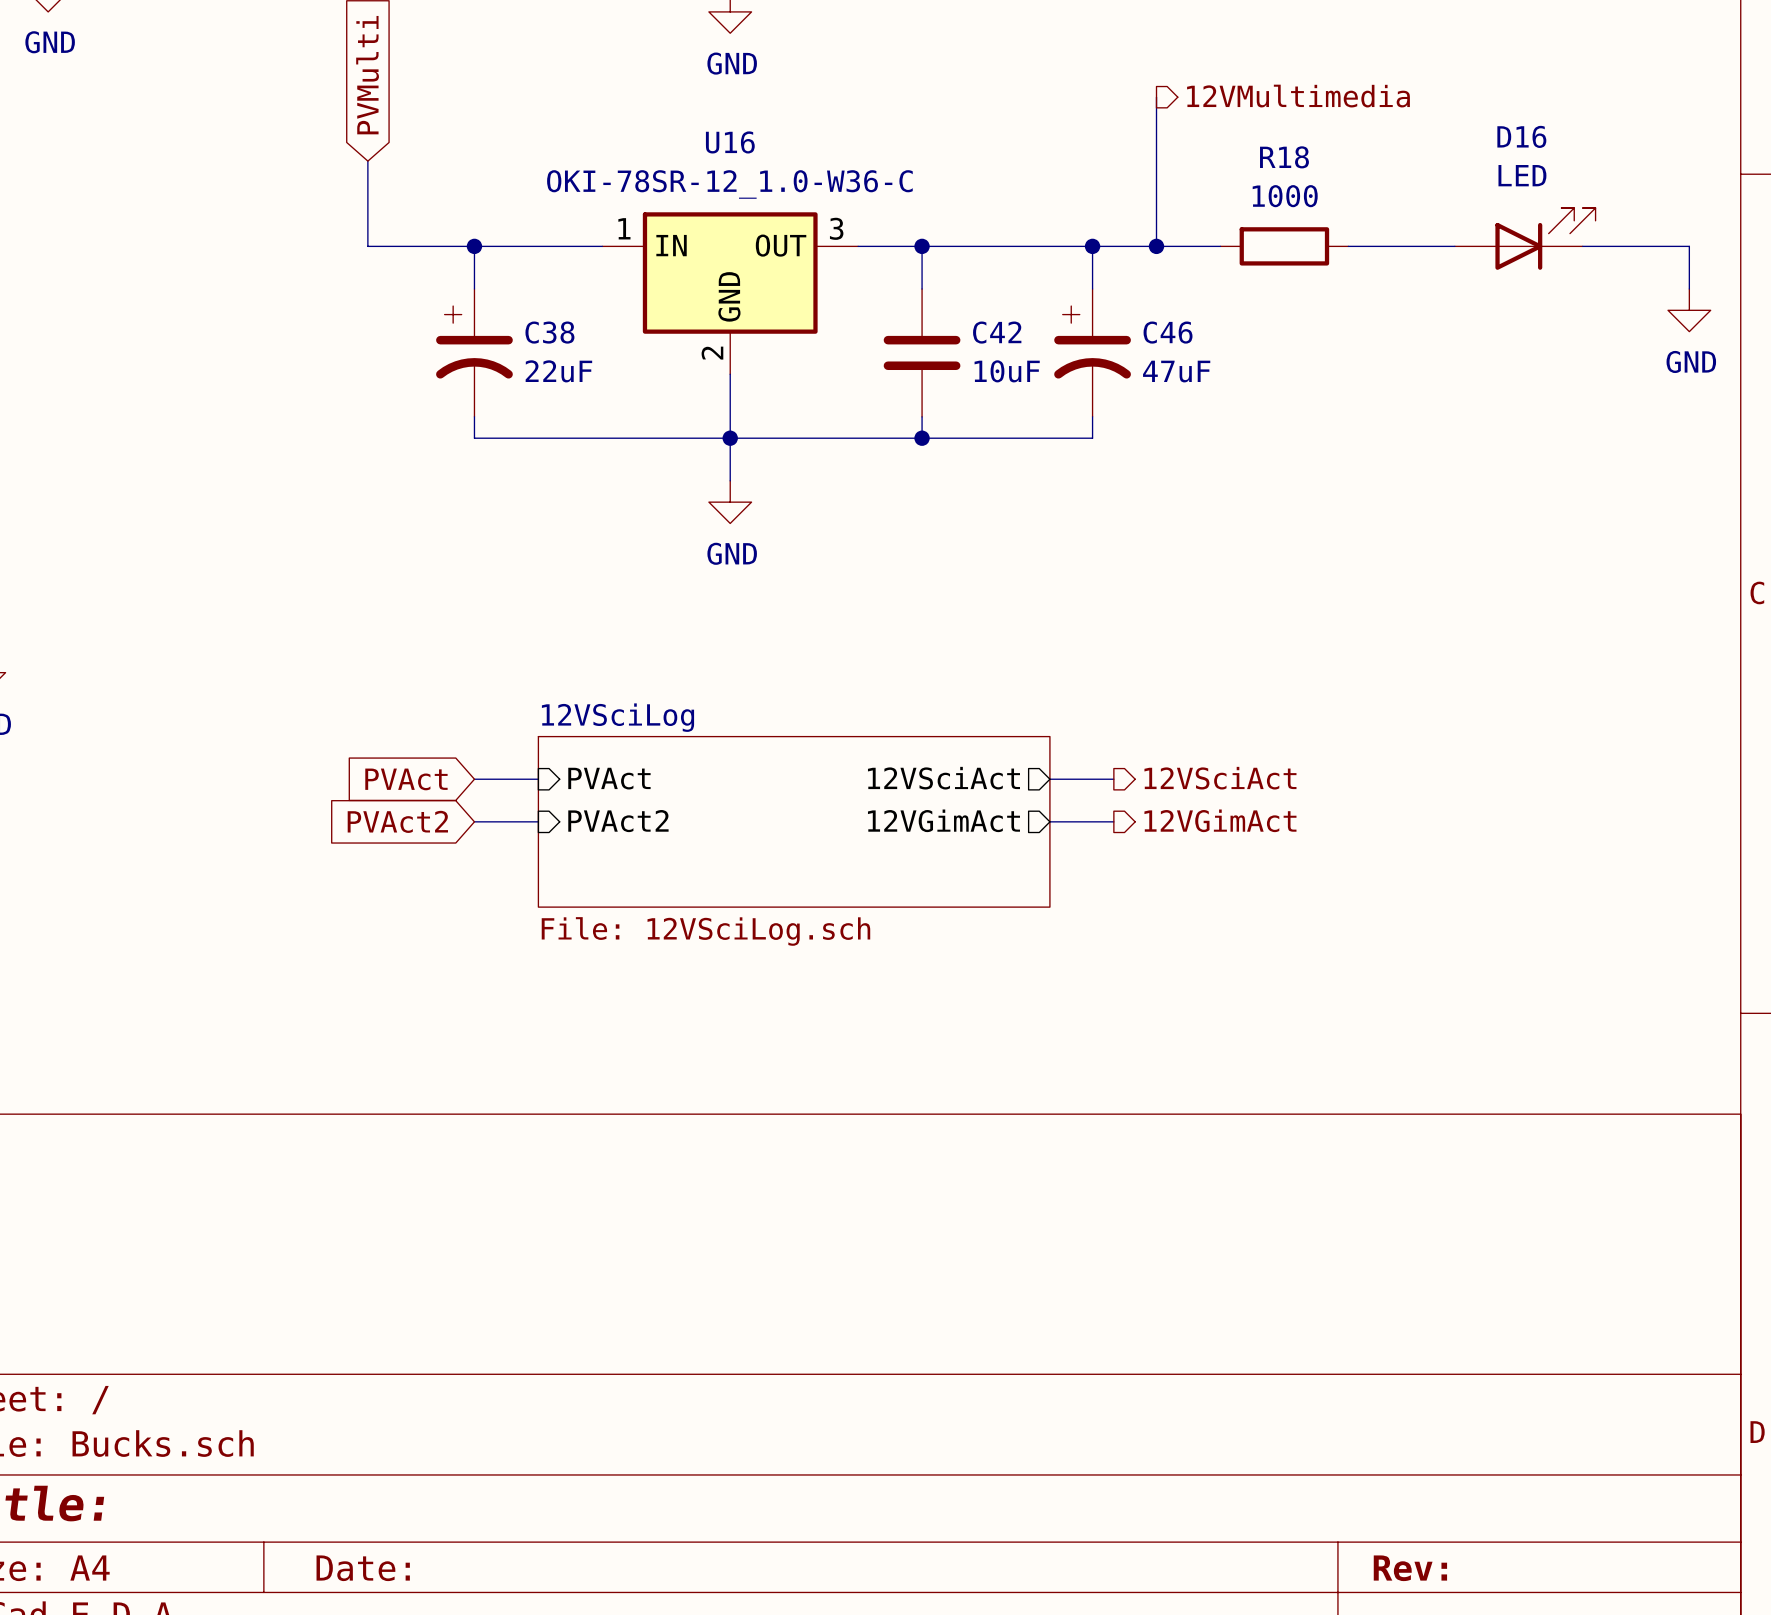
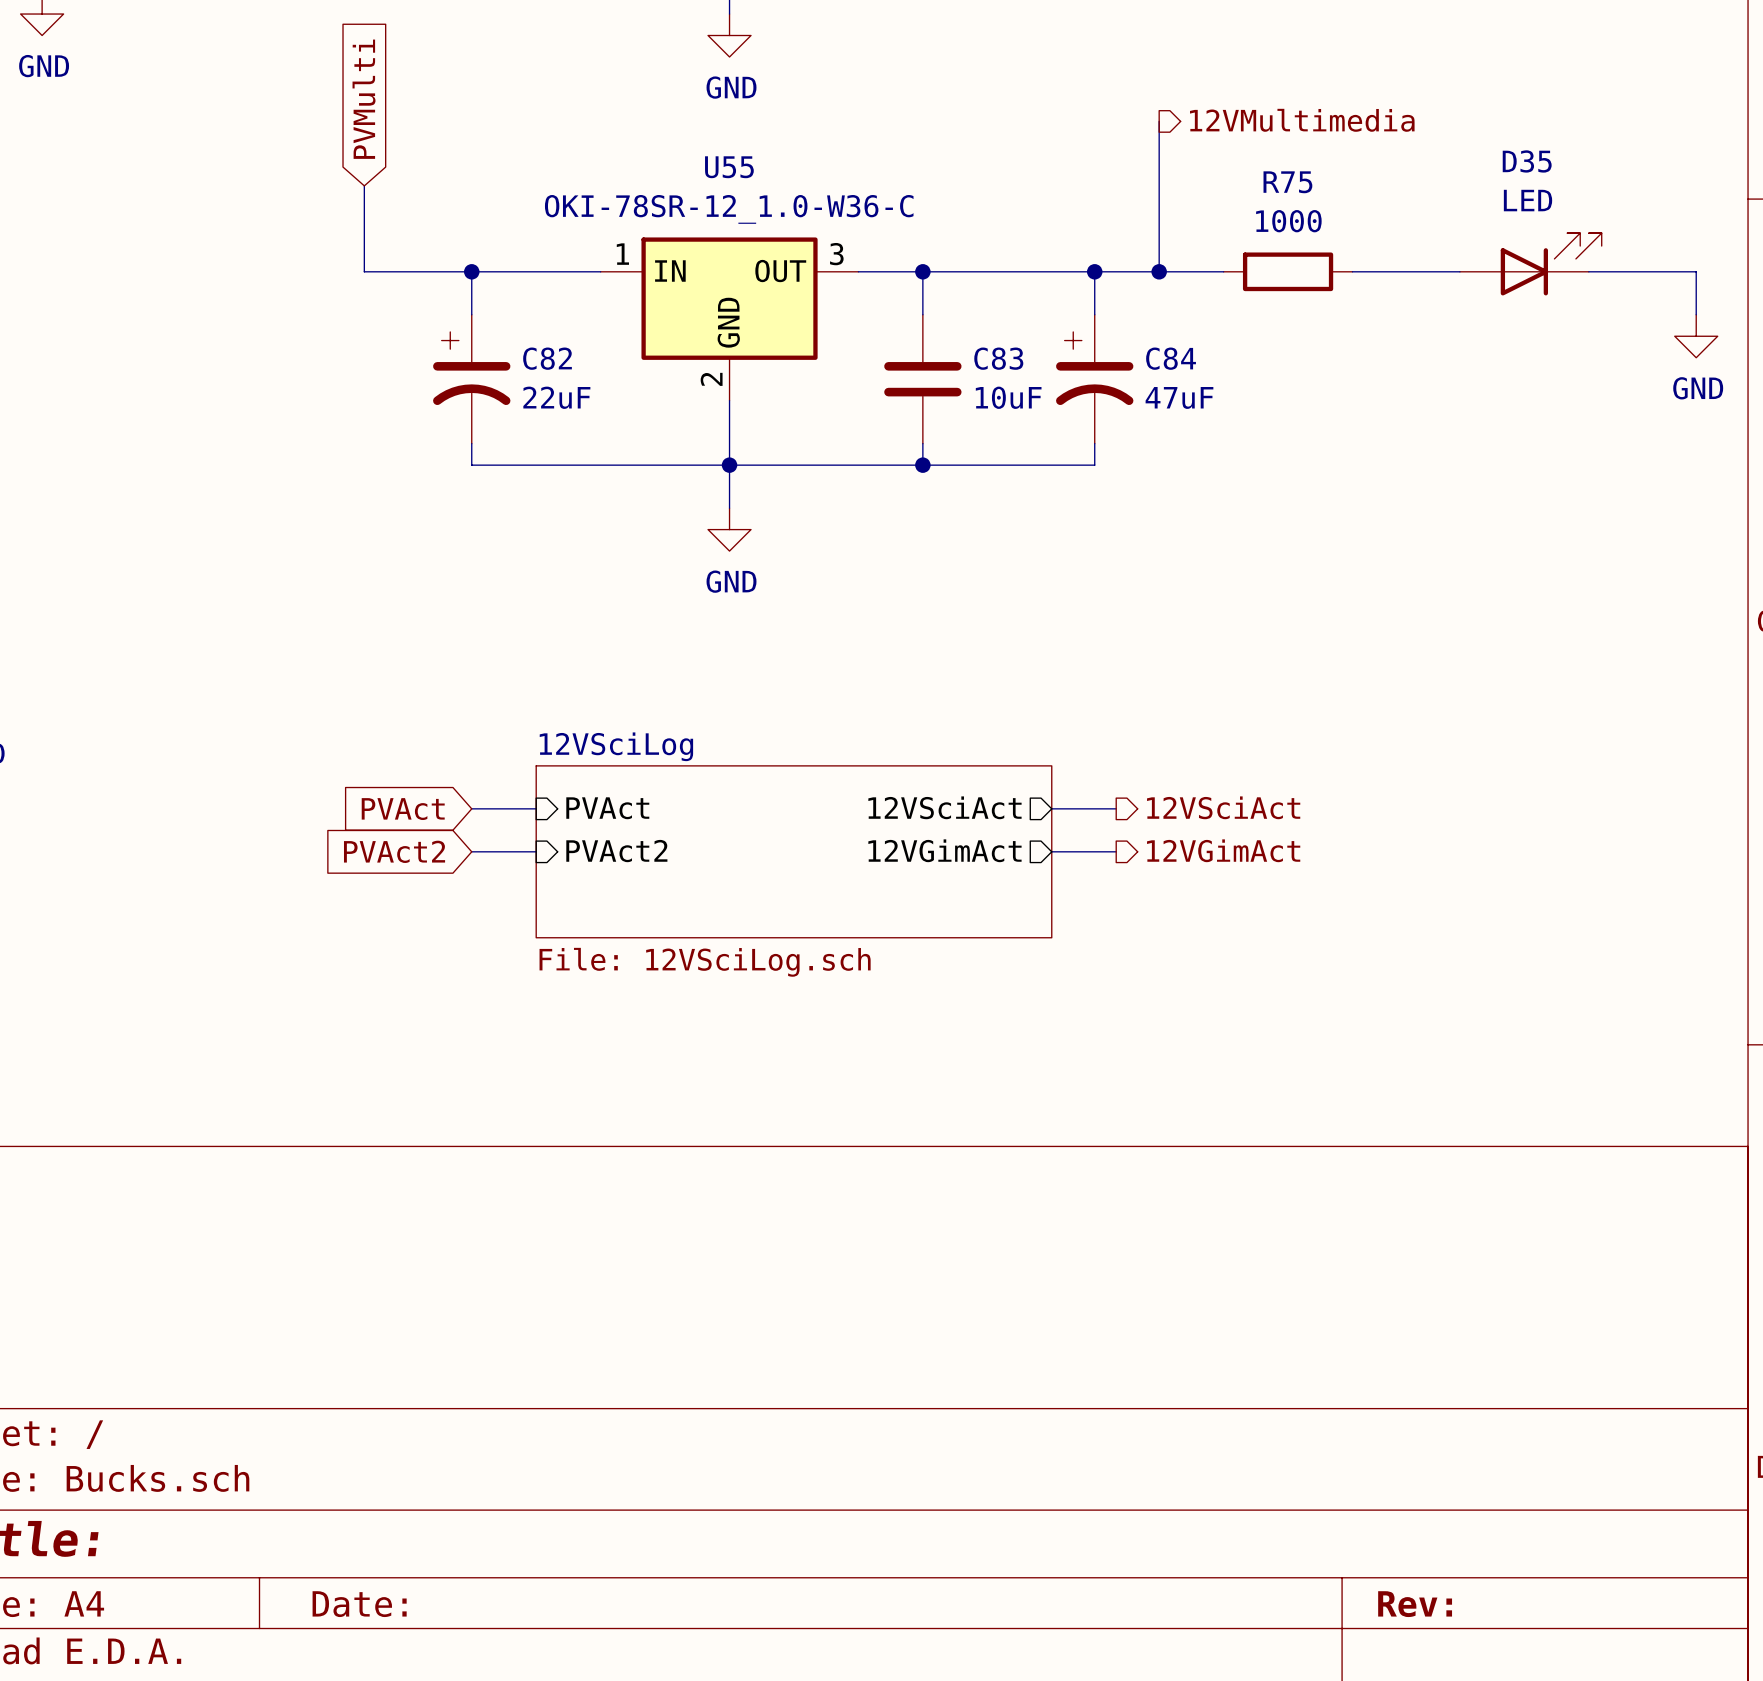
D16 name: D16 (1521, 136) -> D35 (1527, 161)
U16 name: U16 (730, 142) -> U55 (729, 167)
R18 name: R18 (1284, 157) -> R75 (1287, 182)
C38 name: C38 (549, 332) -> C82 (547, 358)
C42 name: C42 (997, 332) -> C83 (998, 358)
C46 name: C46 (1168, 332) -> C84 (1171, 358)

